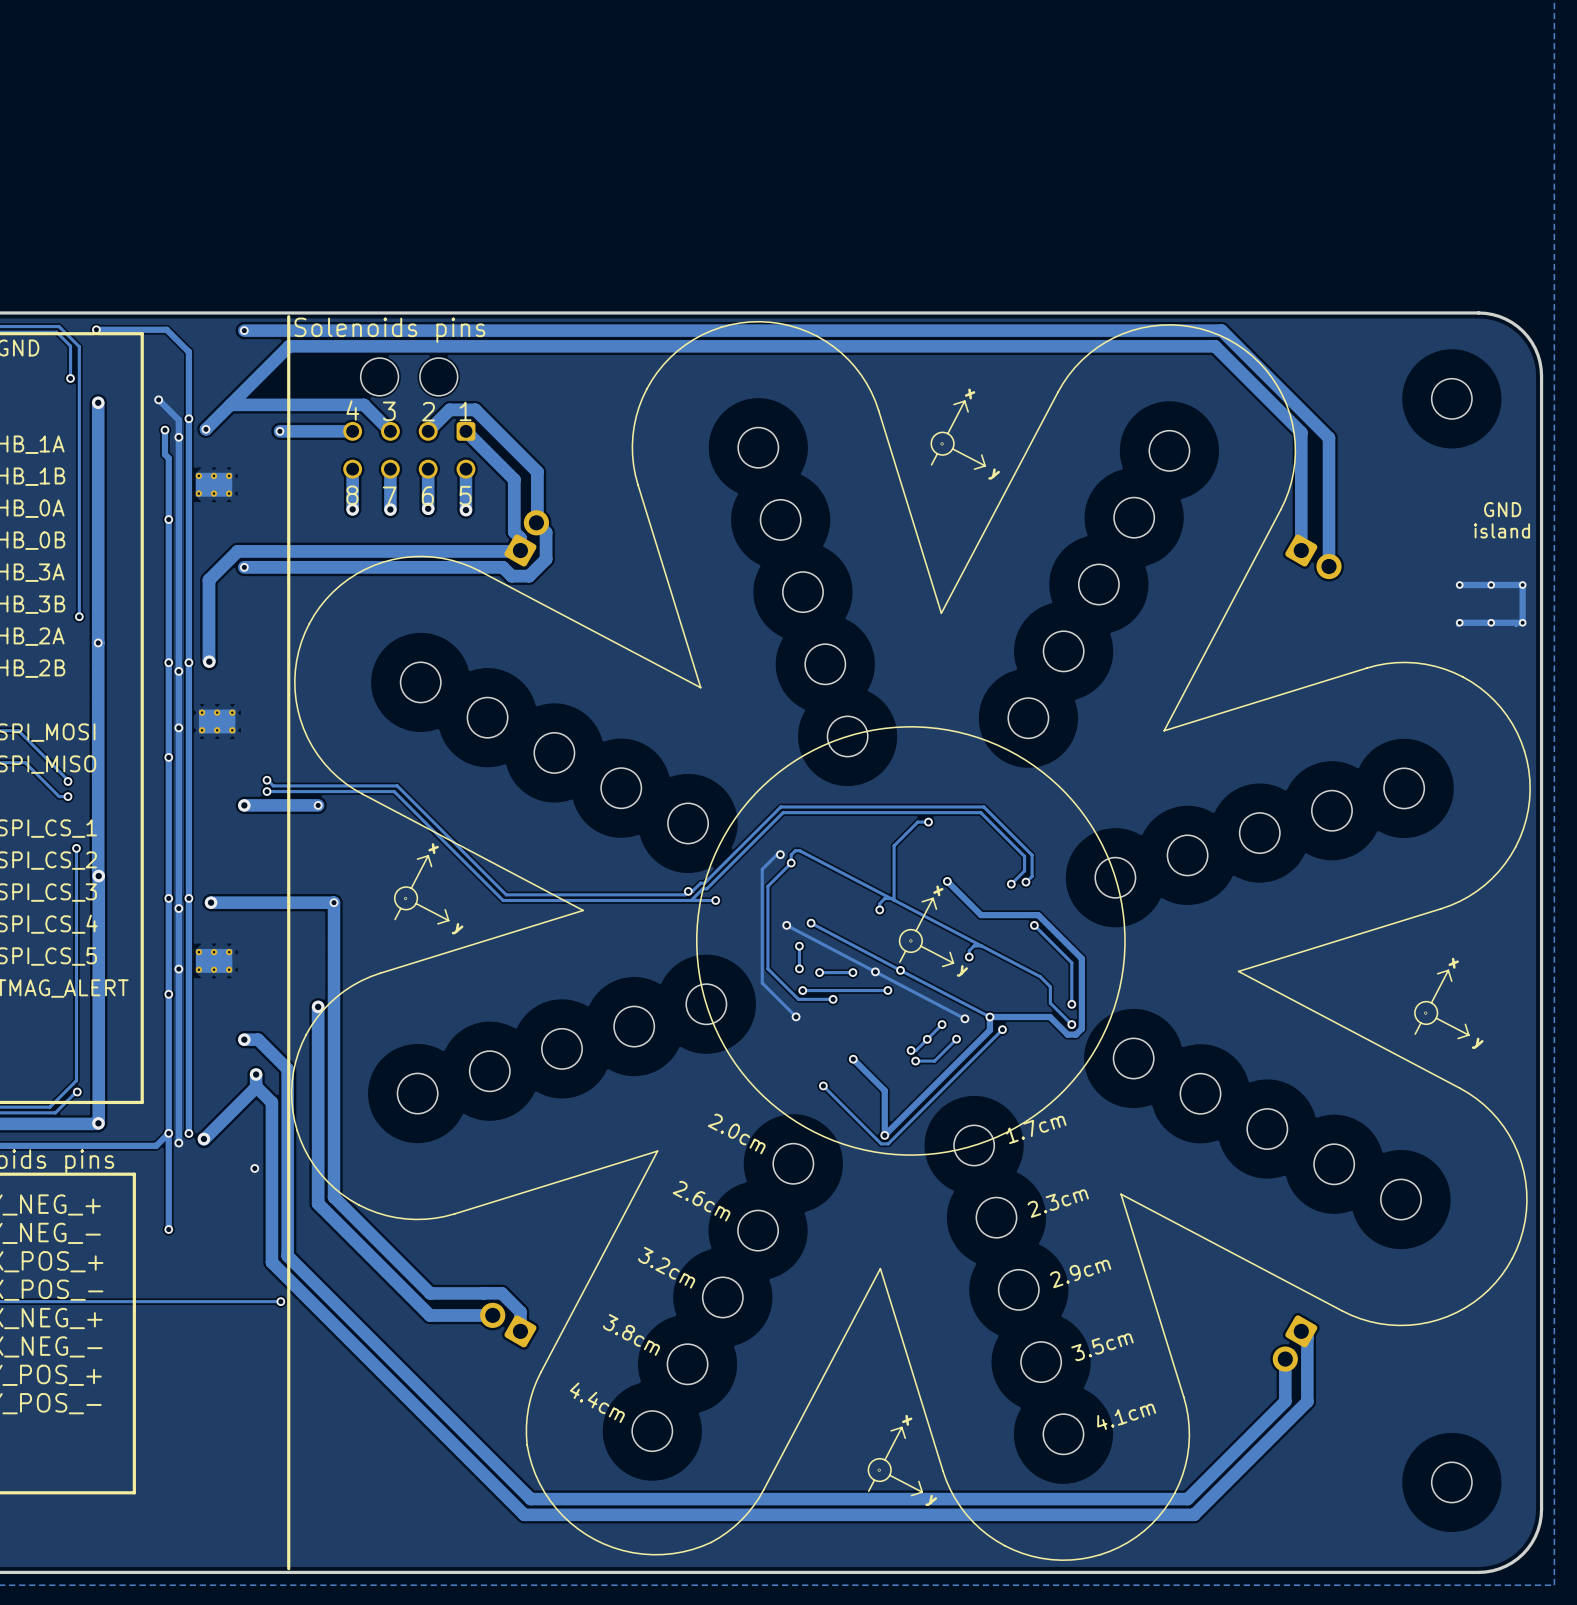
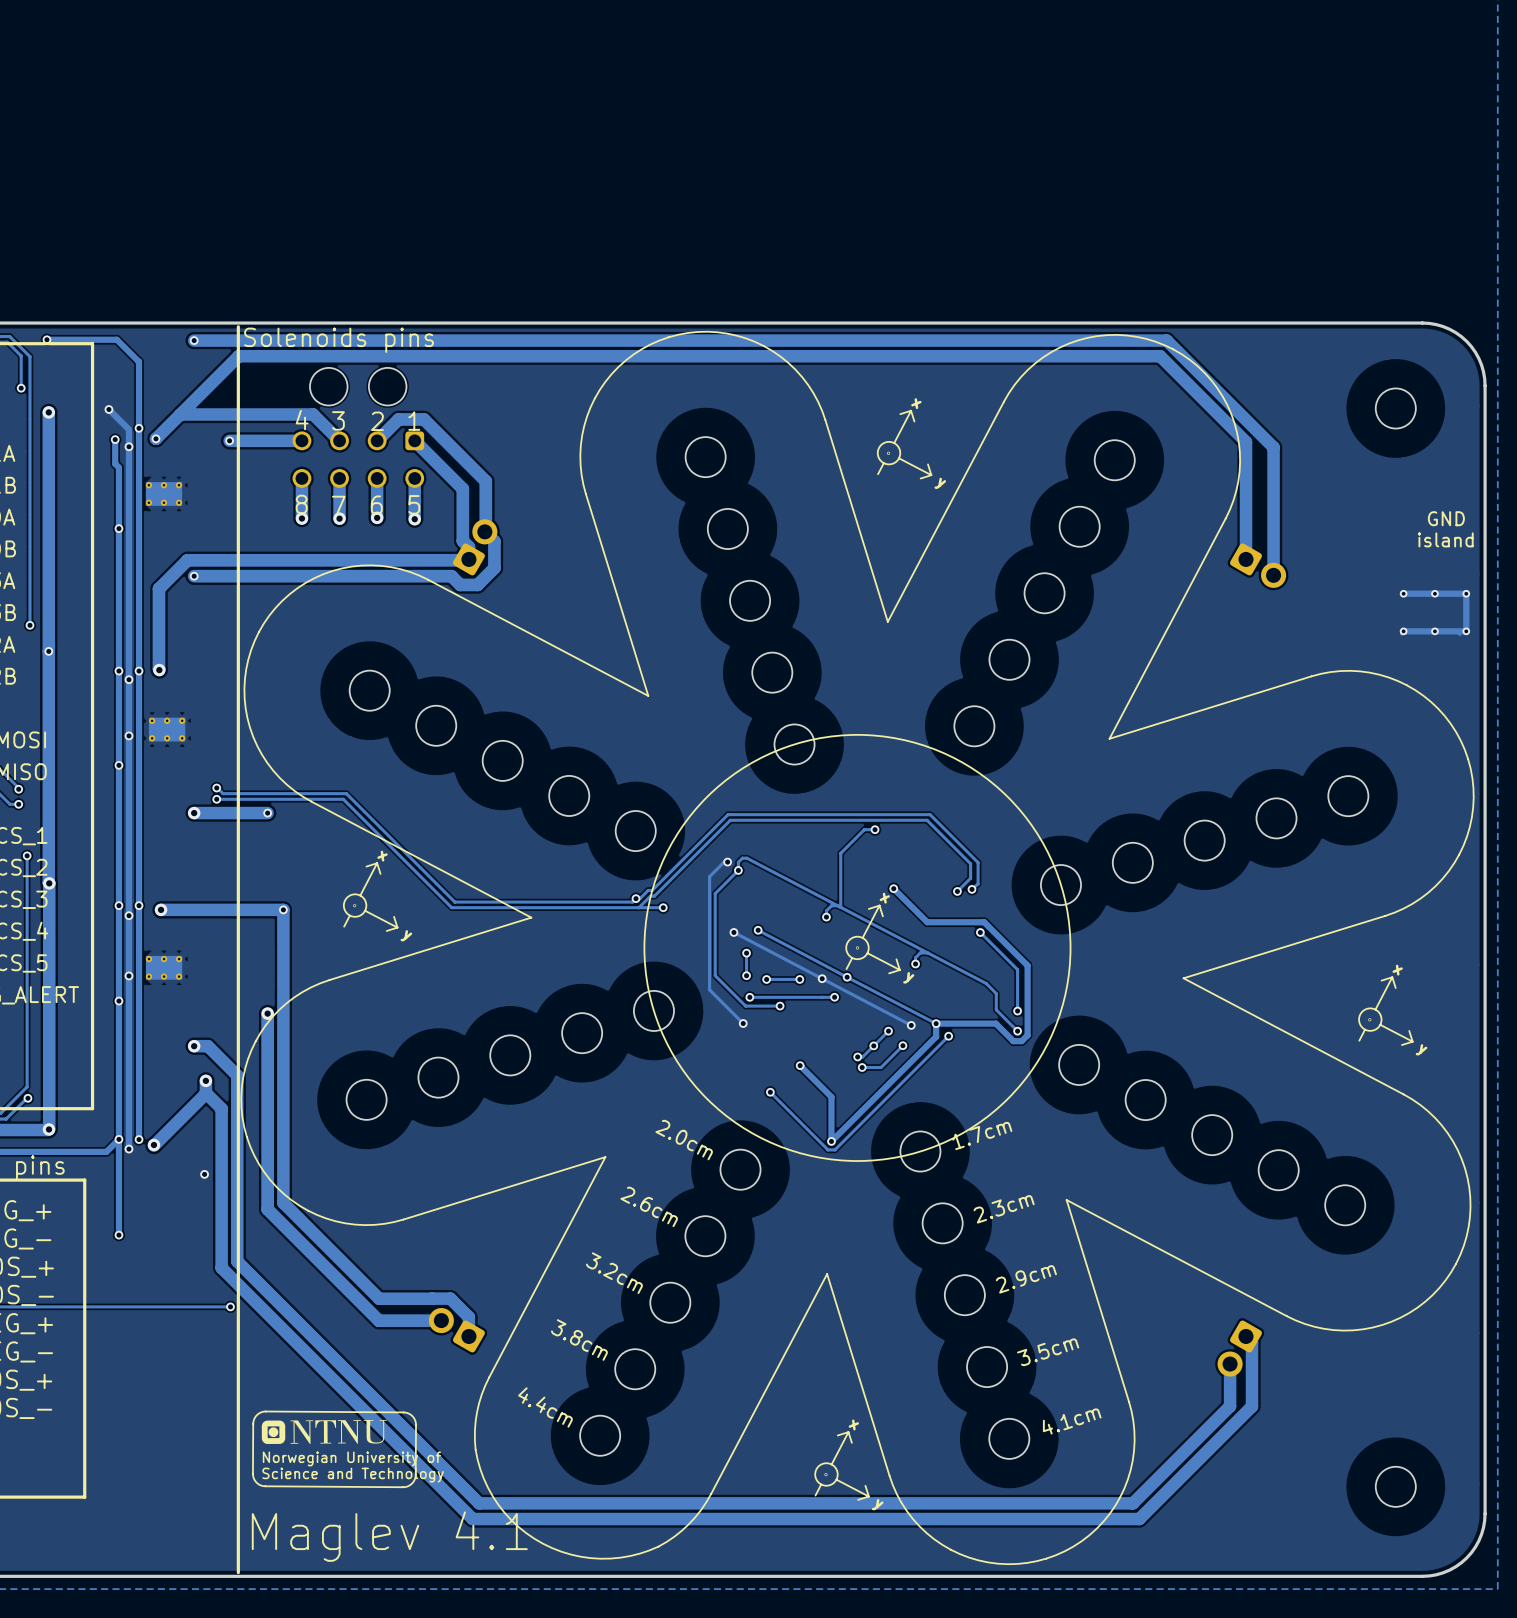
line: none -> (265, 1411) (409, 1413) (413, 1417) (415, 1423) (414, 1480) (409, 1485) (403, 1487) (259, 1485) (255, 1481) (253, 1475) (253, 1422) (258, 1414) (265, 1411)
drawing: none -> [261, 1419, 388, 1445]
text: none -> Norwegian University of (351, 1458)
text: none -> Science and Technology (353, 1475)
text: none -> Maglev 4.1 (389, 1536)

